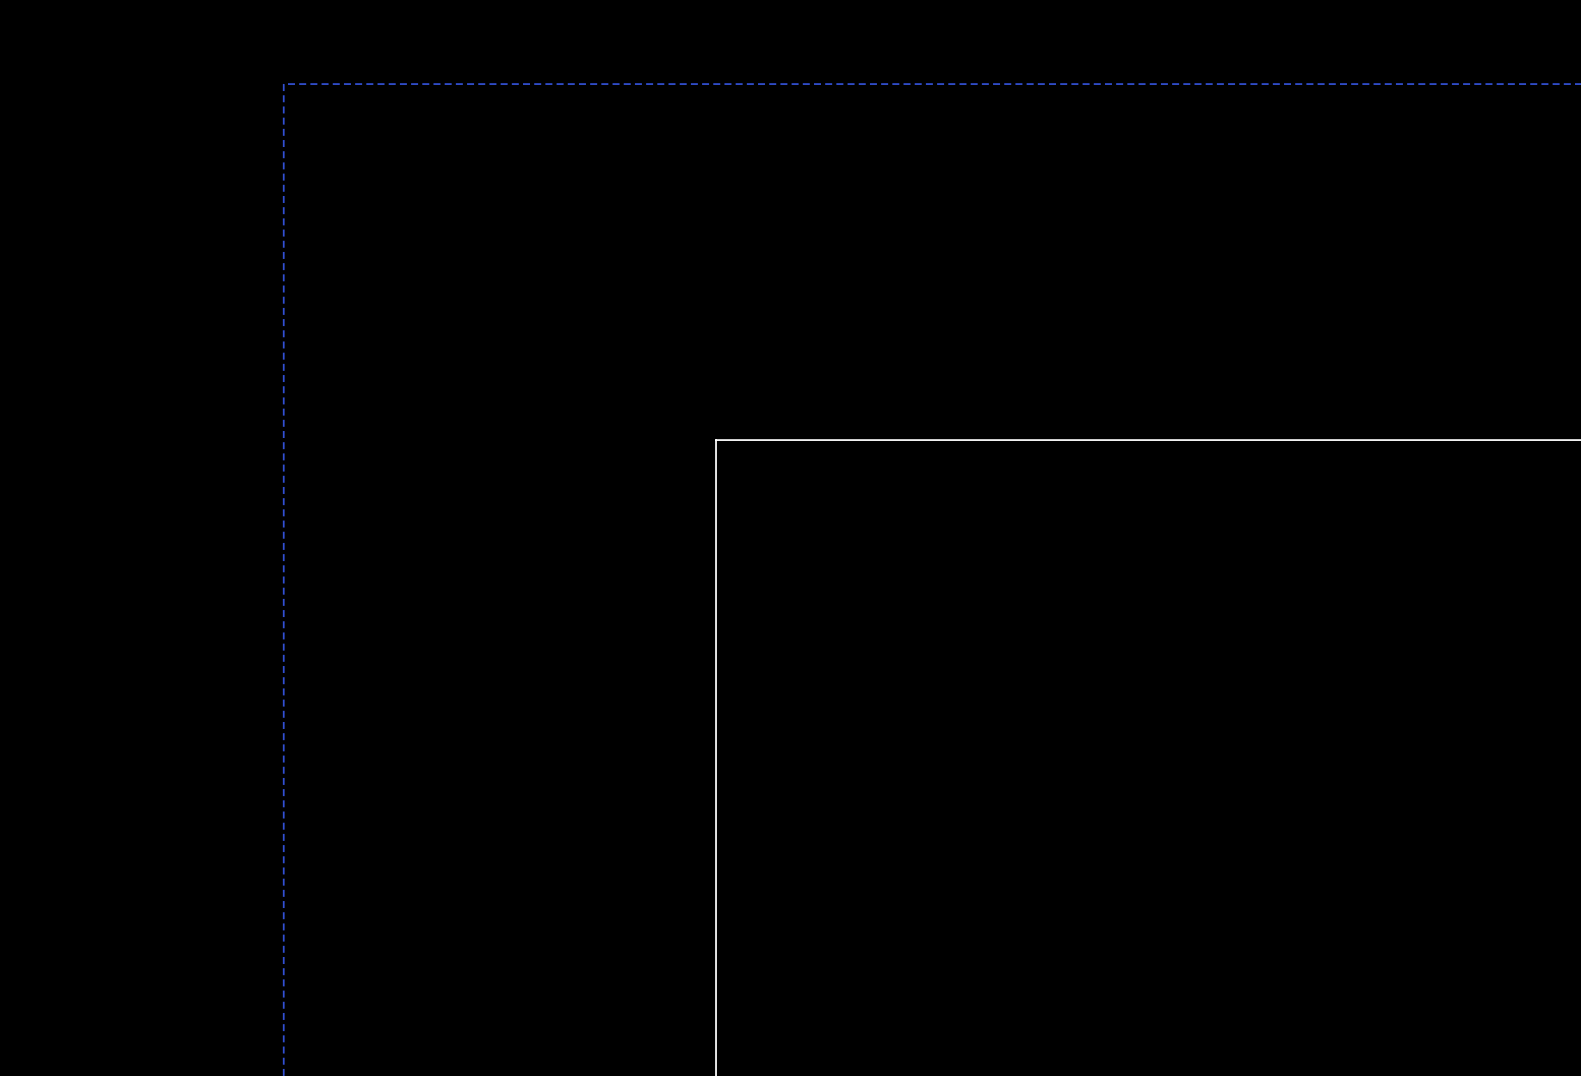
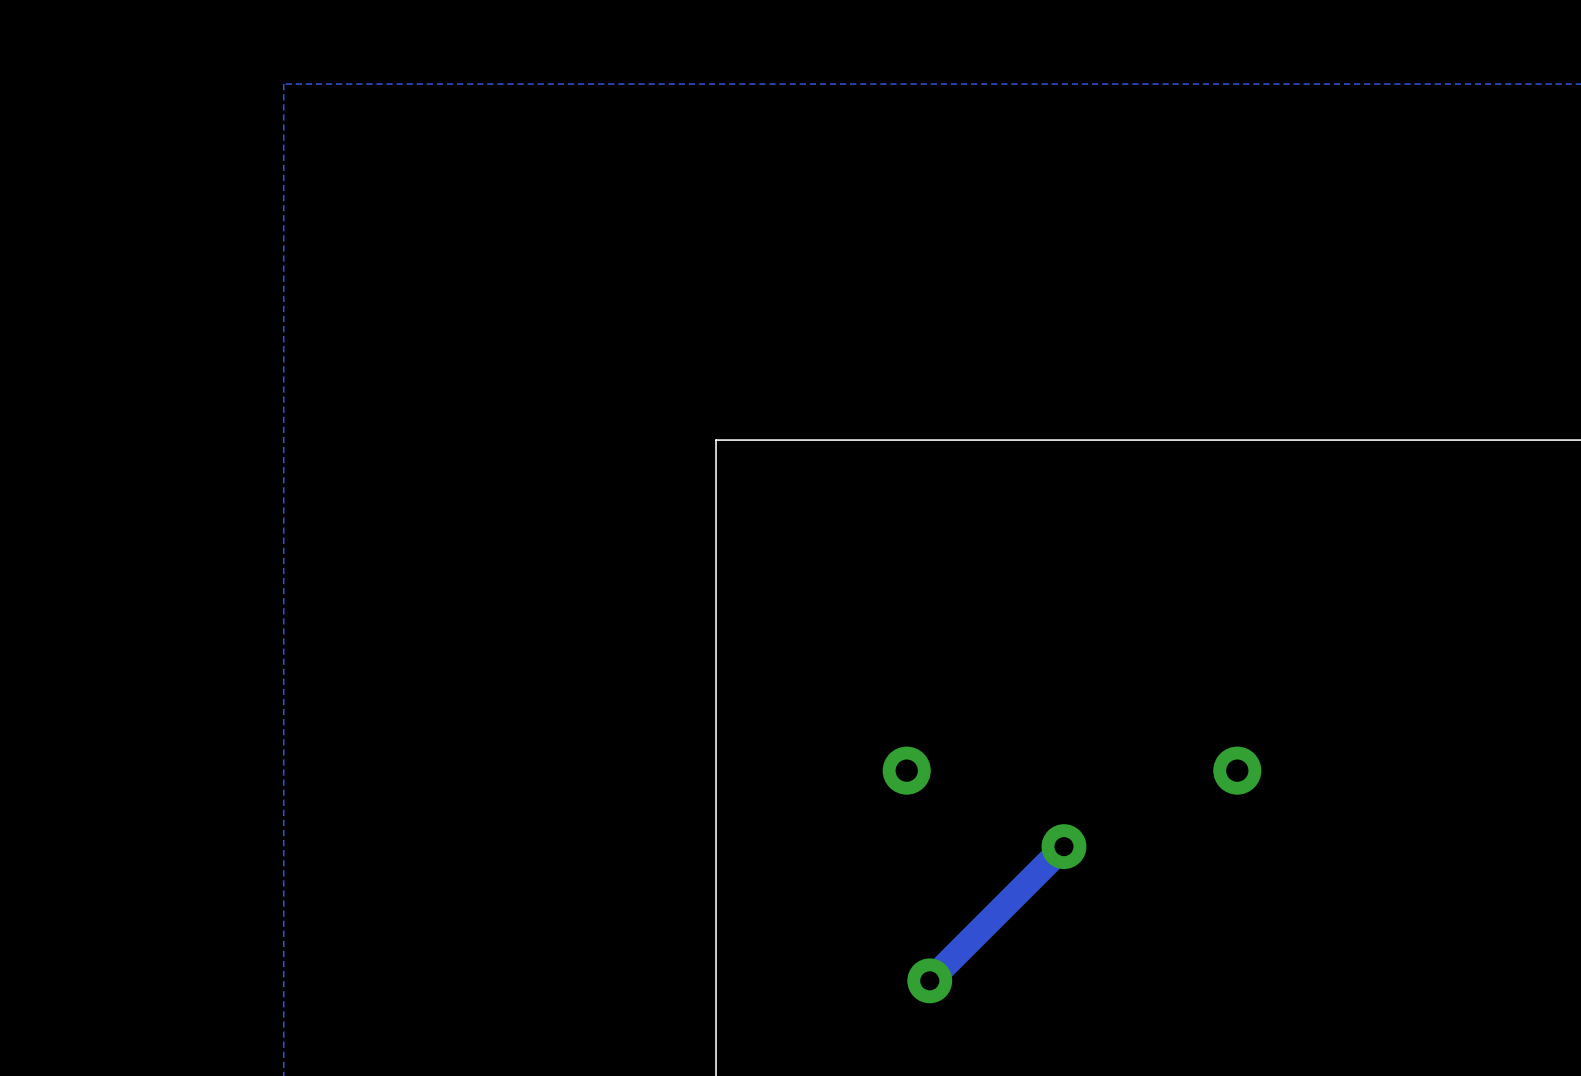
via: none -> (906, 770)
via: none -> (1237, 770)
track: none -> (1063, 846) (929, 980)
via: none -> (1063, 846)
via: none -> (929, 980)

